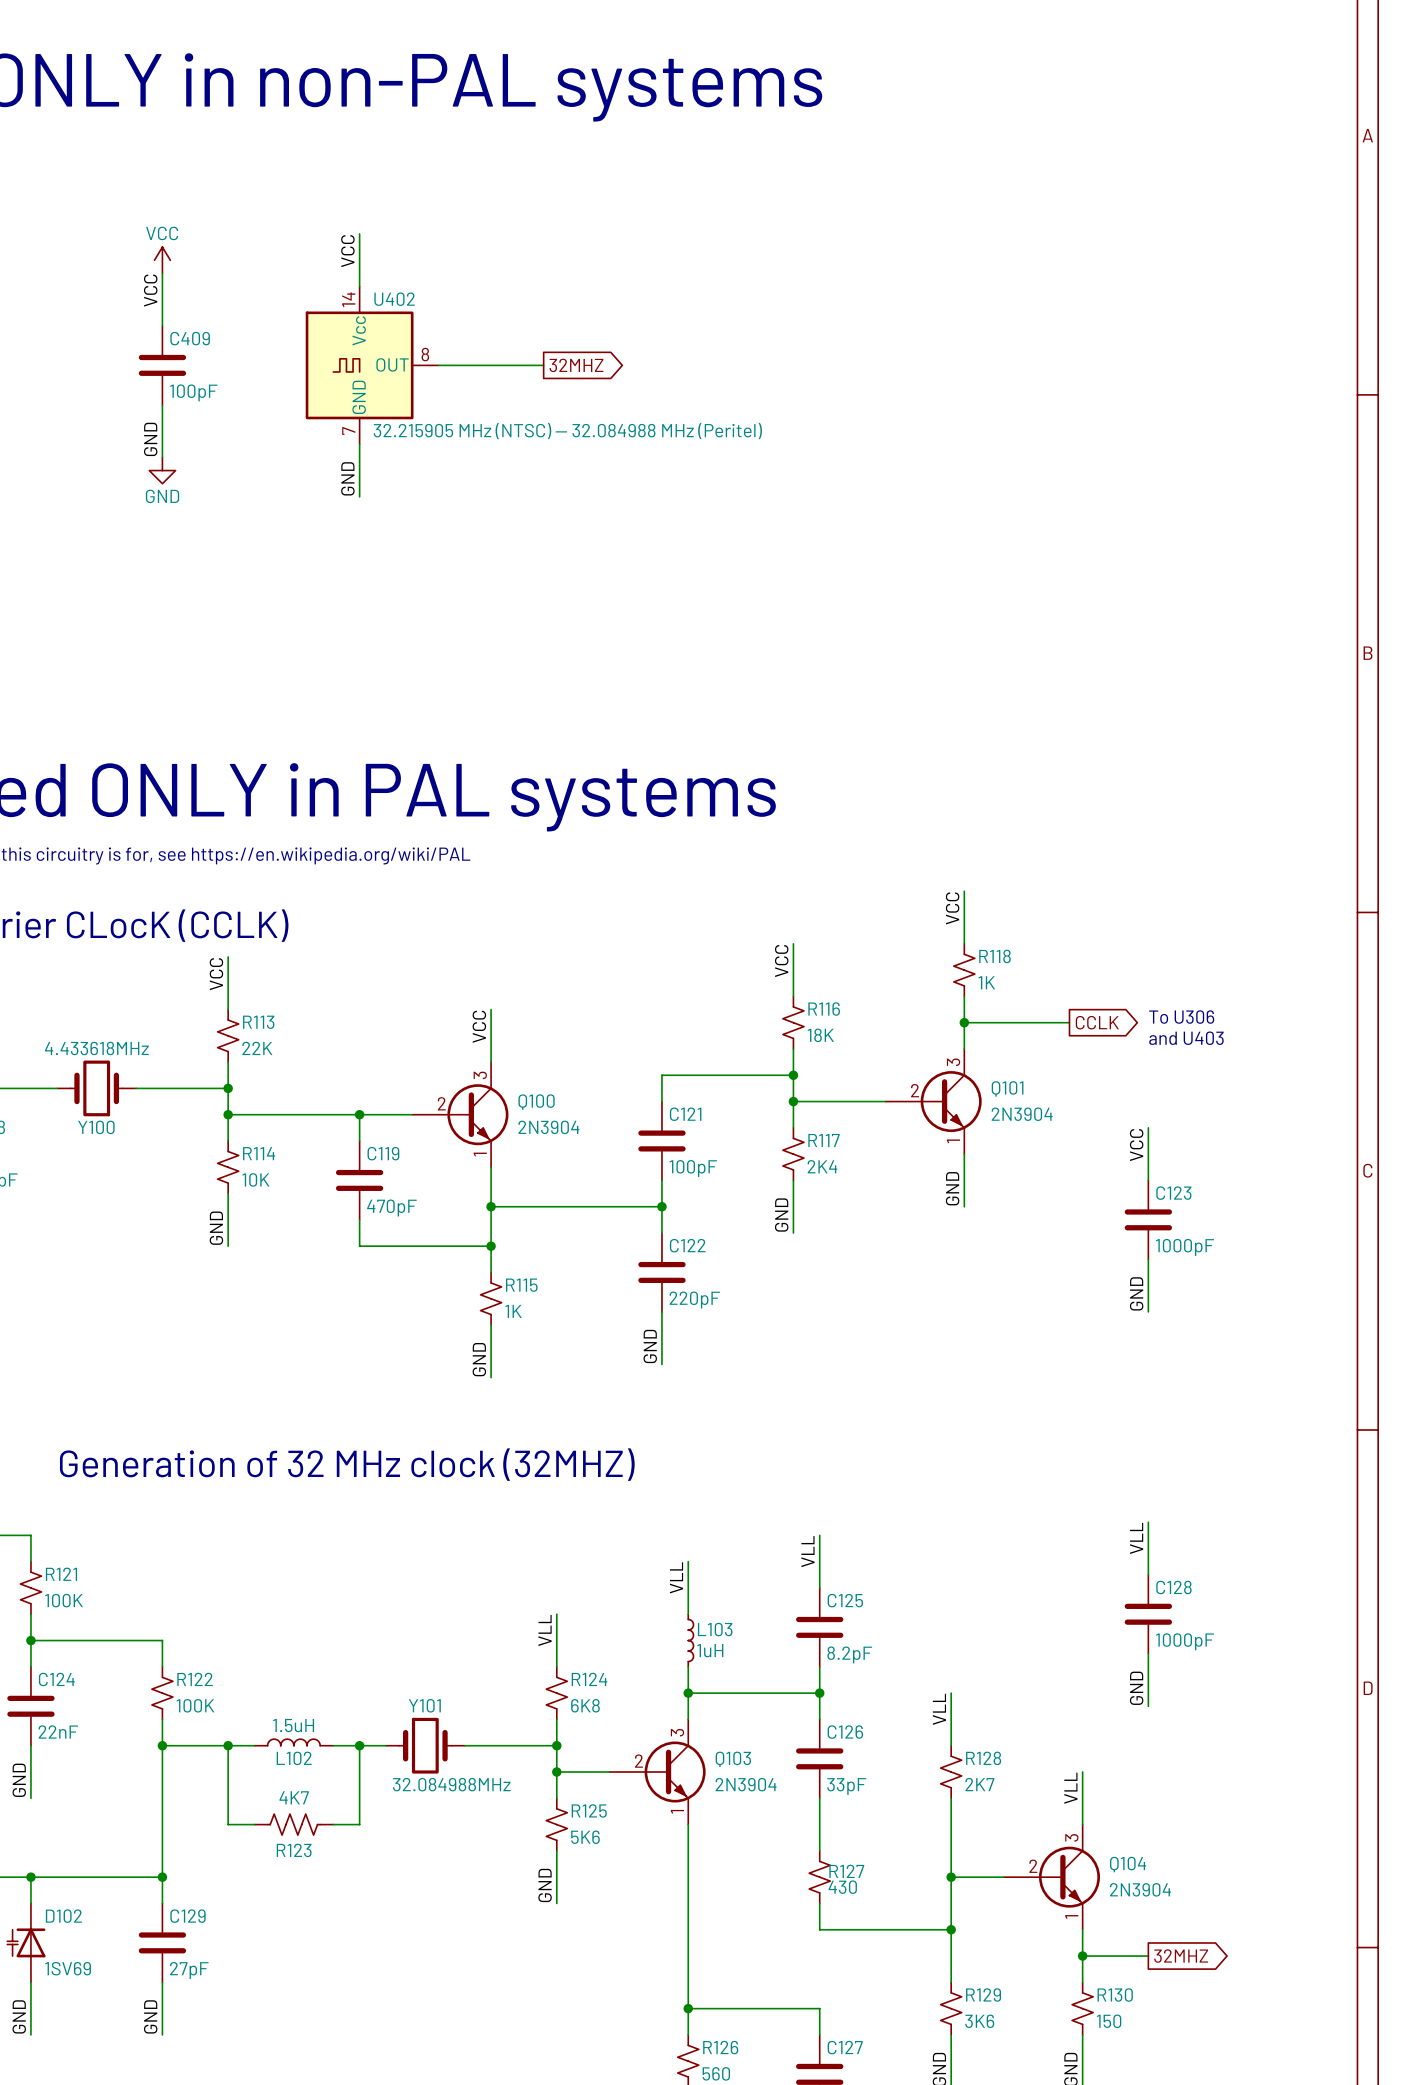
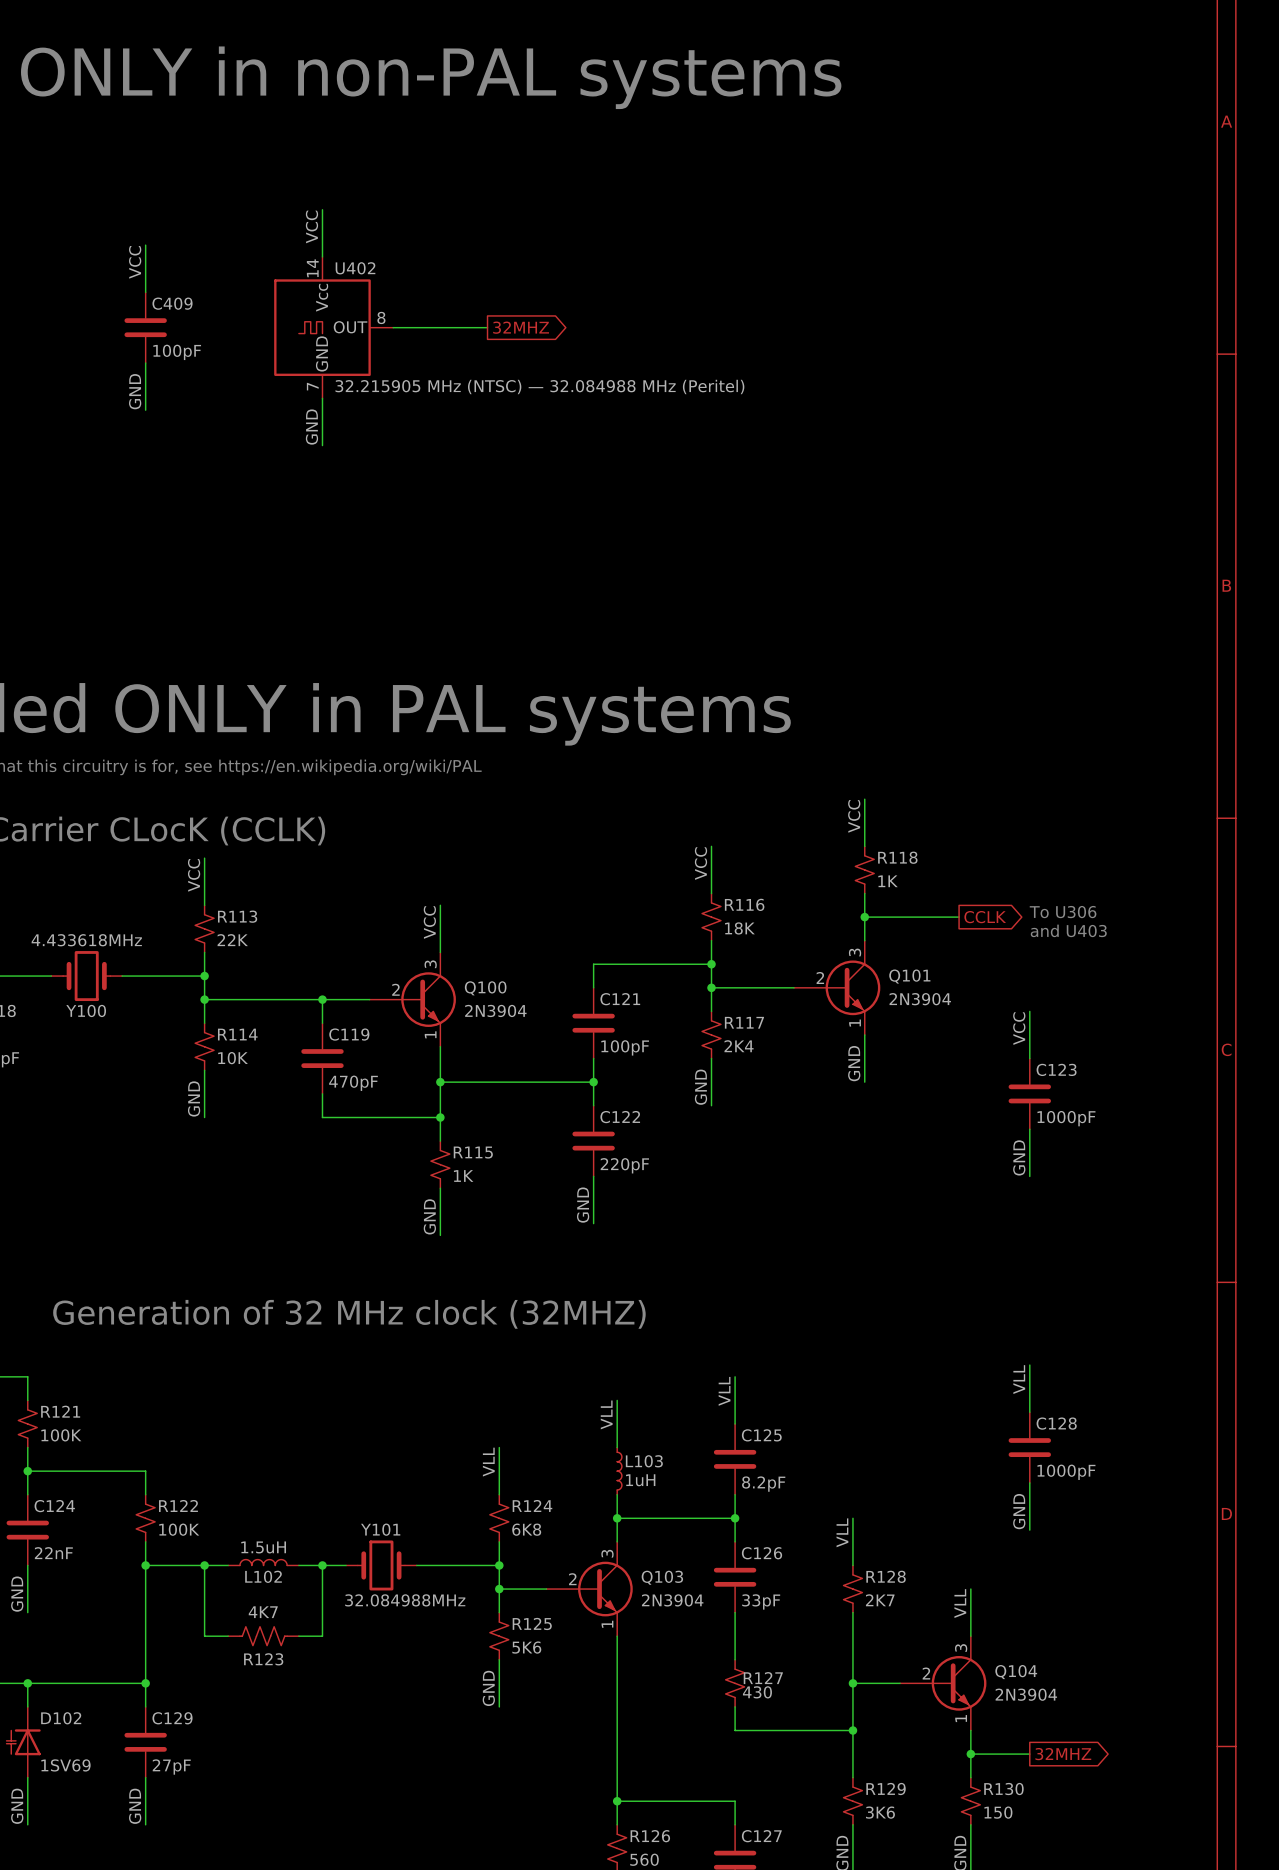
power symbol: VCC (162, 260) -> none
power symbol: GND (162, 470) -> none

